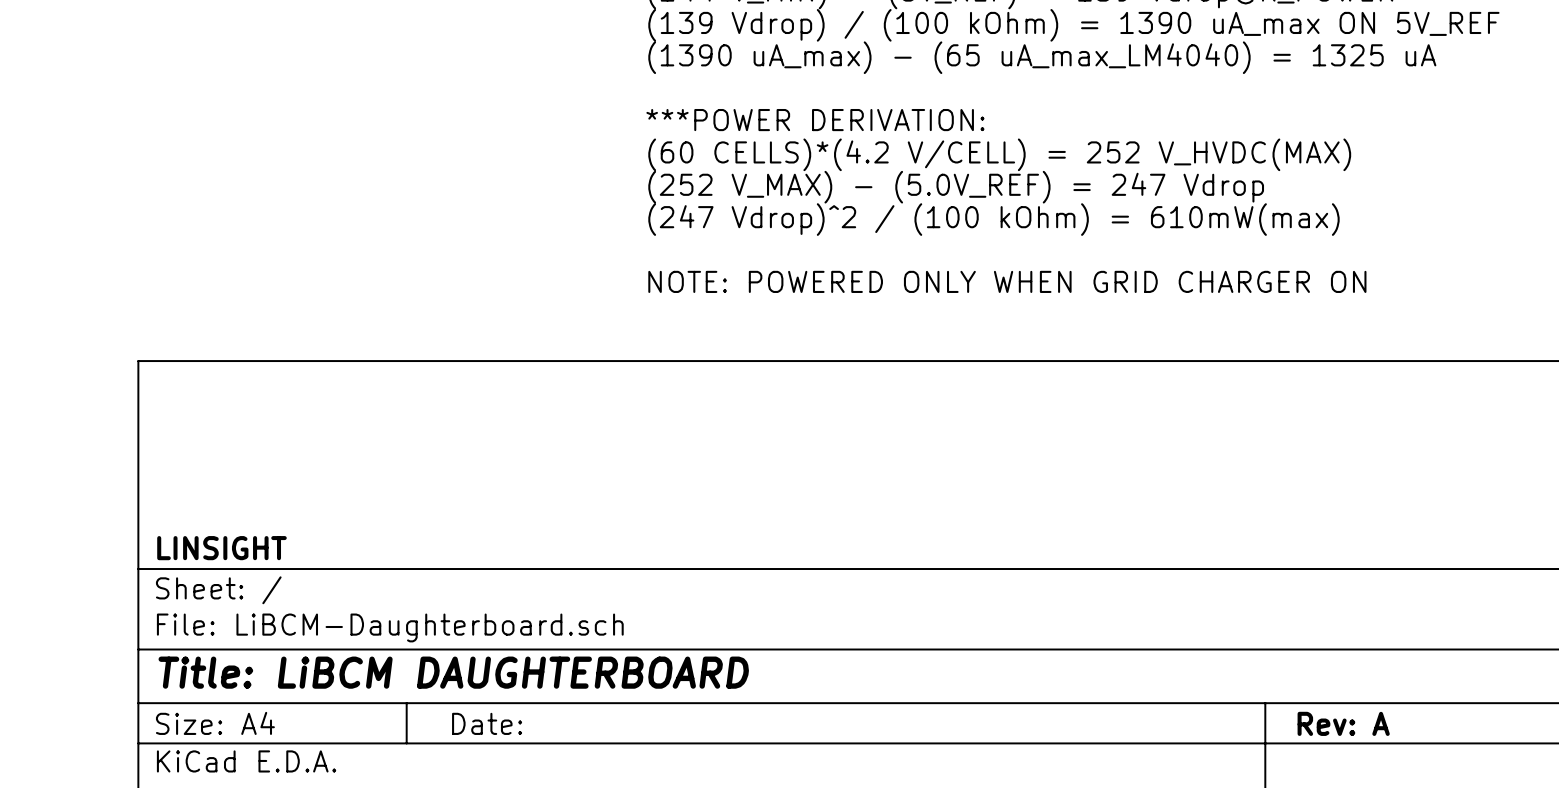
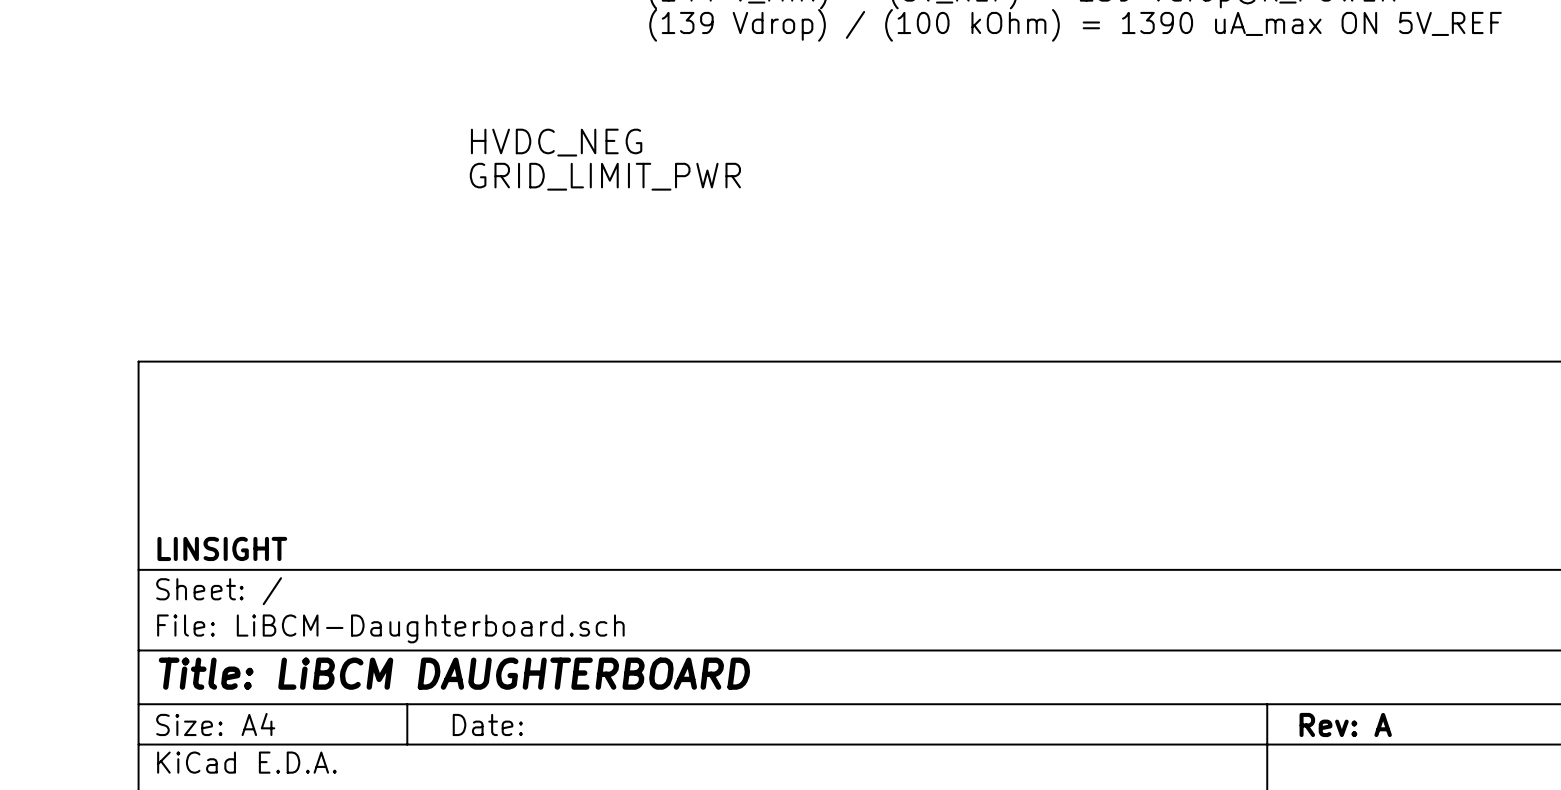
text: (1390 uA_max) - (65 uA_max_LM4040) = 1325 uA (1042, 57) -> none
text: ***POWER DERIVATION: (815, 120) -> none
label: none -> HVDC_NEG (556, 142)
text: (60 CELLS)*(4.2 V/CELL) = 252 V_HVDC(MAX) (999, 154) -> none
label: none -> GRID_LIMIT_PWR (605, 176)
text: (252 V_MAX) - (5.0V_REF) = 247 Vdrop (956, 187) -> none
text: (247 Vdrop)^2 / (100 kOhm) = 610mW(max) (993, 219) -> none
text: NOTE: POWERED ONLY WHEN GRID CHARGER ON (1007, 281) -> none

